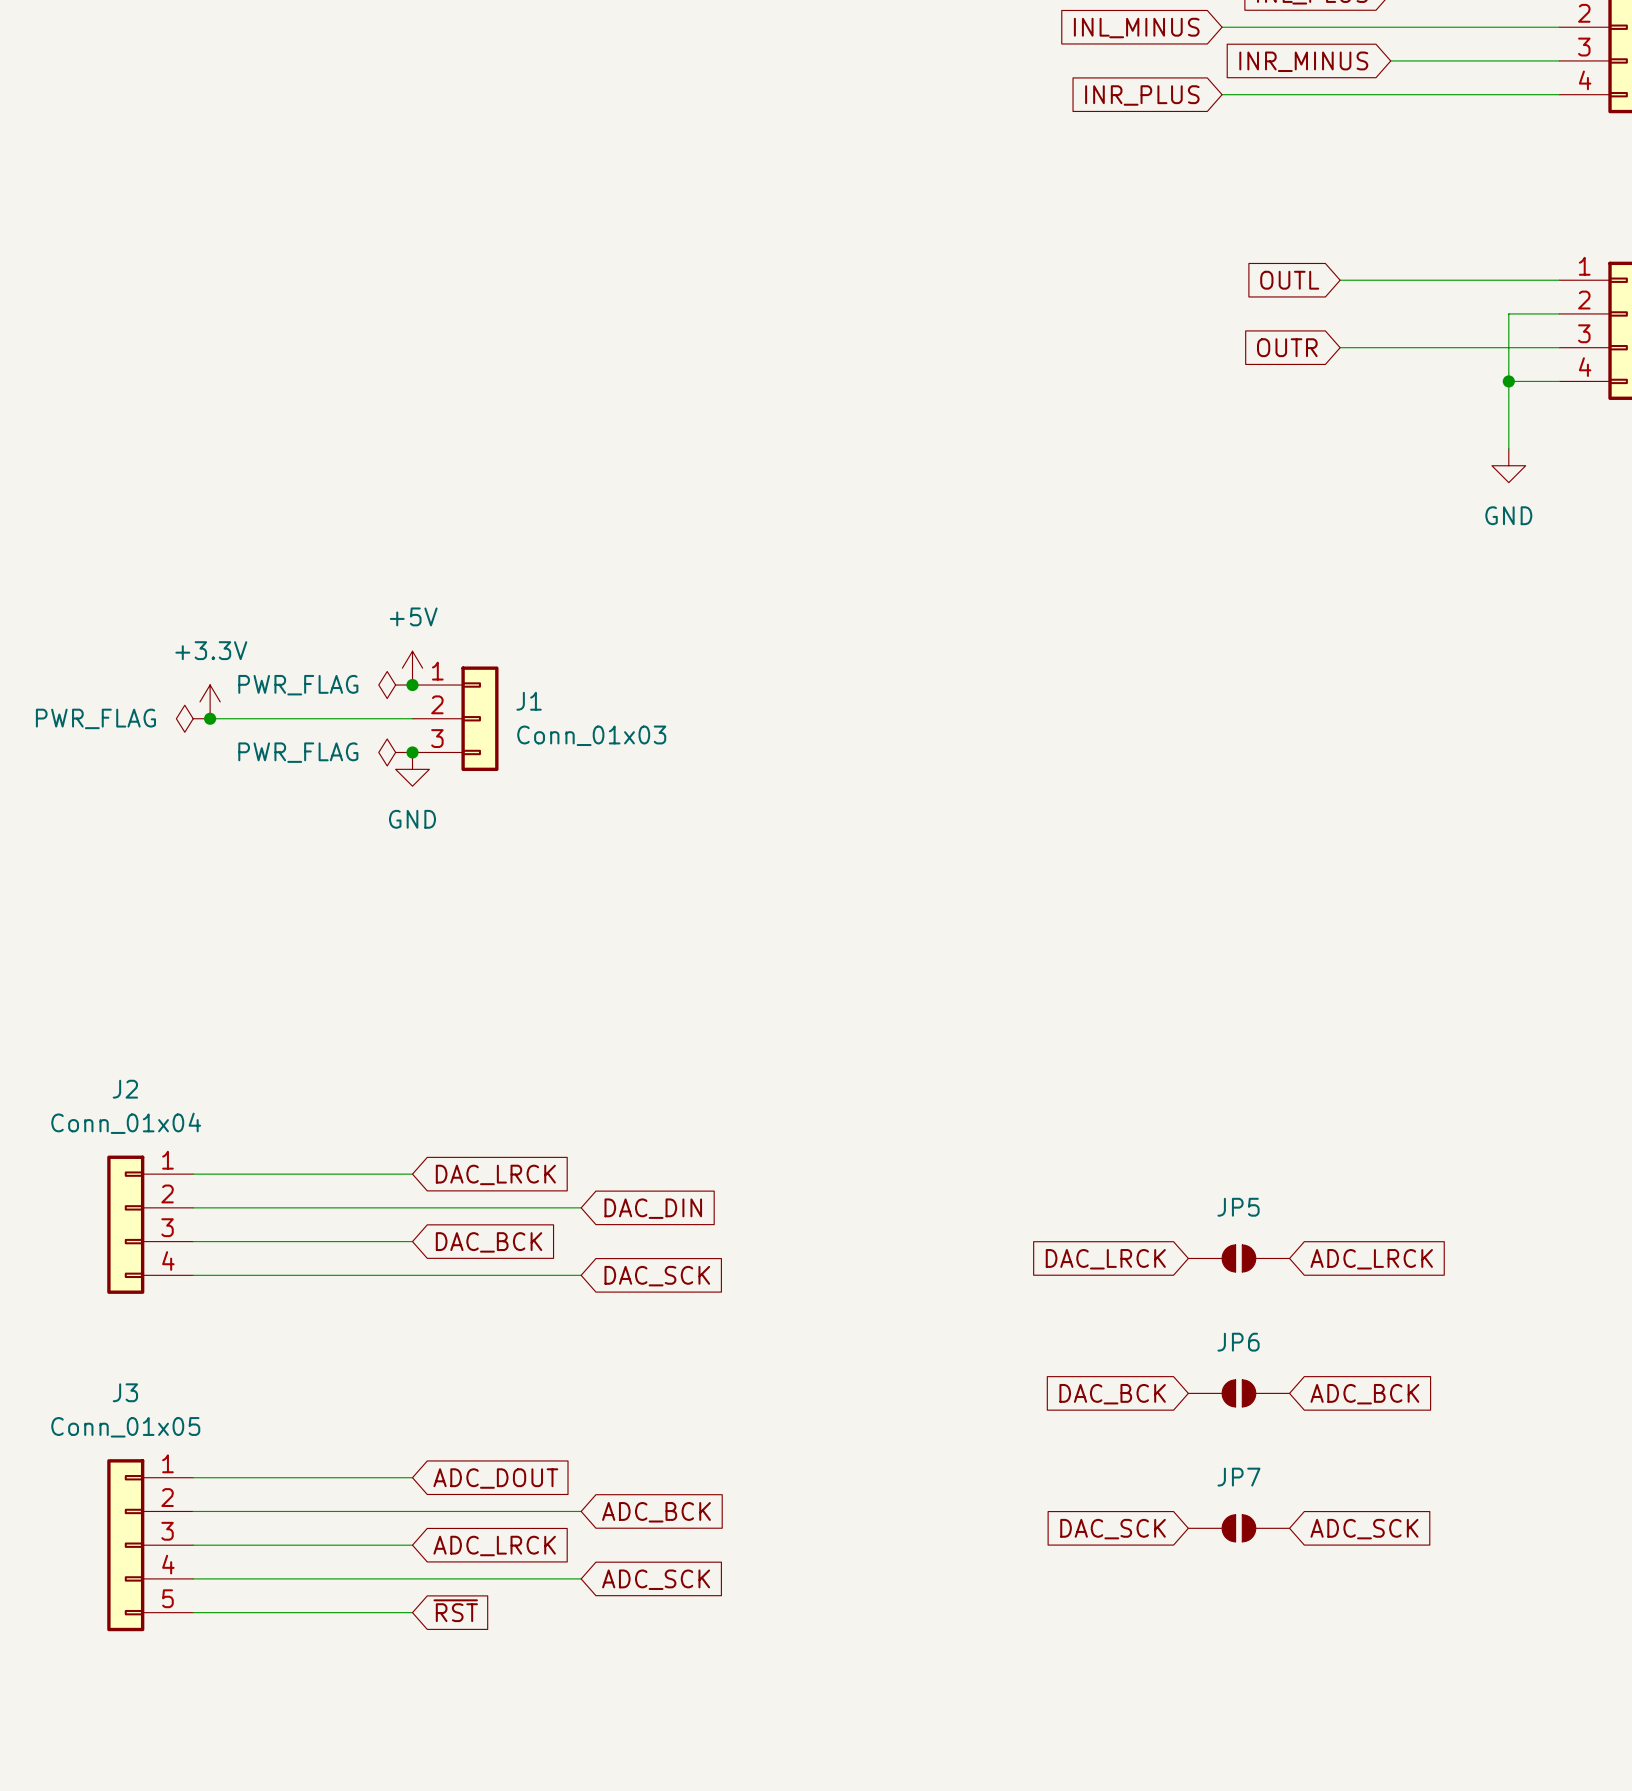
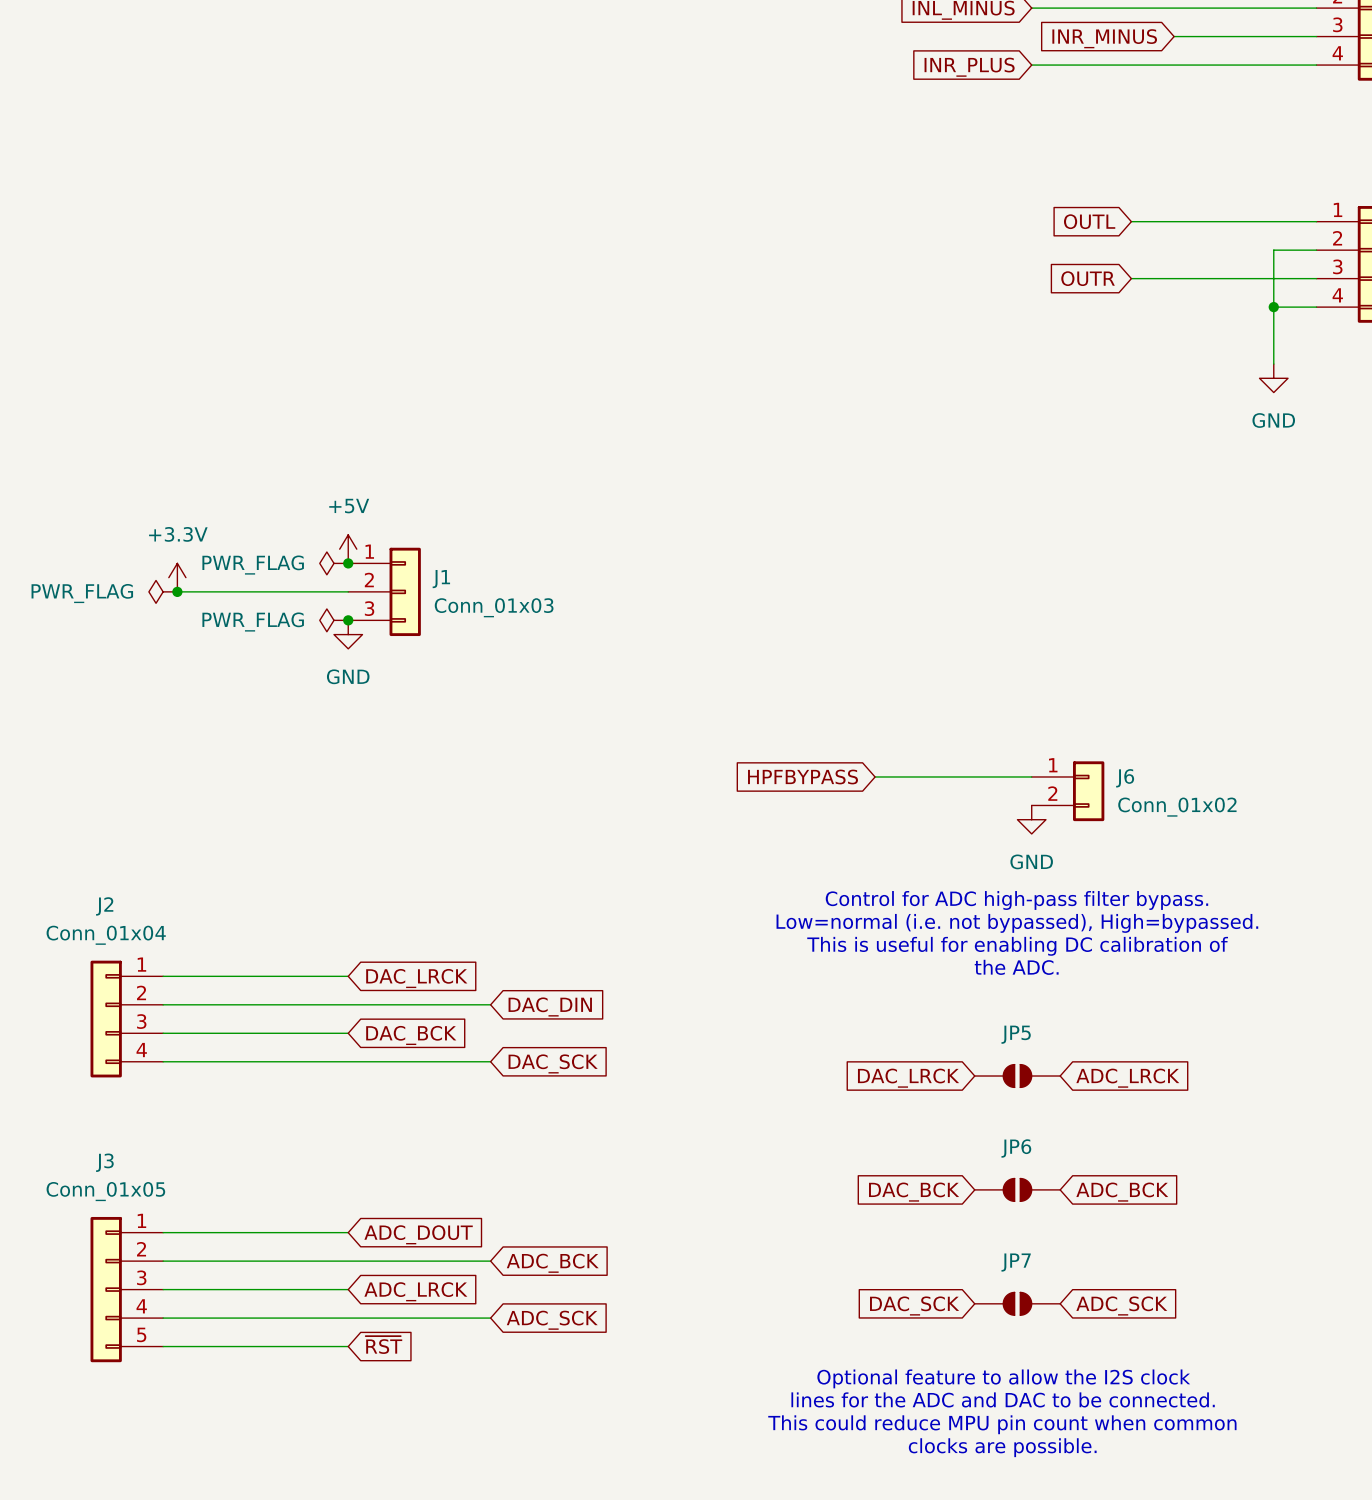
global label: none -> HPFBYPASS (803, 777)
wire: none -> (875, 776) (1031, 776)
J6: none -> Conn_01x02 (1068, 791)
power symbol: none -> GND (1031, 819)
text: none -> Control for ADC high-pass filter bypass. (1016, 900)
text: none -> Low=normal (i.e. not bypassed), High=bypassed. (1017, 923)
text: none -> This is useful for enabling DC calibration of (1017, 946)
text: none -> the ADC. (1016, 967)
JP5 position: (1238, 1258) -> (1017, 1076)
global label position: DAC_LRCK (1105, 1259) -> DAC_LRCK (908, 1078)
global label position: ADC_LRCK (1371, 1259) -> ADC_LRCK (1127, 1078)
JP6 position: (1238, 1393) -> (1017, 1189)
global label position: DAC_BCK (1112, 1394) -> DAC_BCK (914, 1192)
global label position: ADC_BCK (1364, 1394) -> ADC_BCK (1122, 1192)
JP7 position: (1238, 1528) -> (1017, 1303)
global label position: DAC_SCK (1113, 1529) -> DAC_SCK (914, 1306)
global label position: ADC_SCK (1364, 1529) -> ADC_SCK (1121, 1306)
text: none -> Optional feature to allow the I2S clock (1003, 1378)
text: none -> lines for the ADC and DAC to be connected. (1003, 1399)
text: none -> This could reduce MPU pin count when common (1002, 1424)
text: none -> clocks are possible. (1002, 1447)

